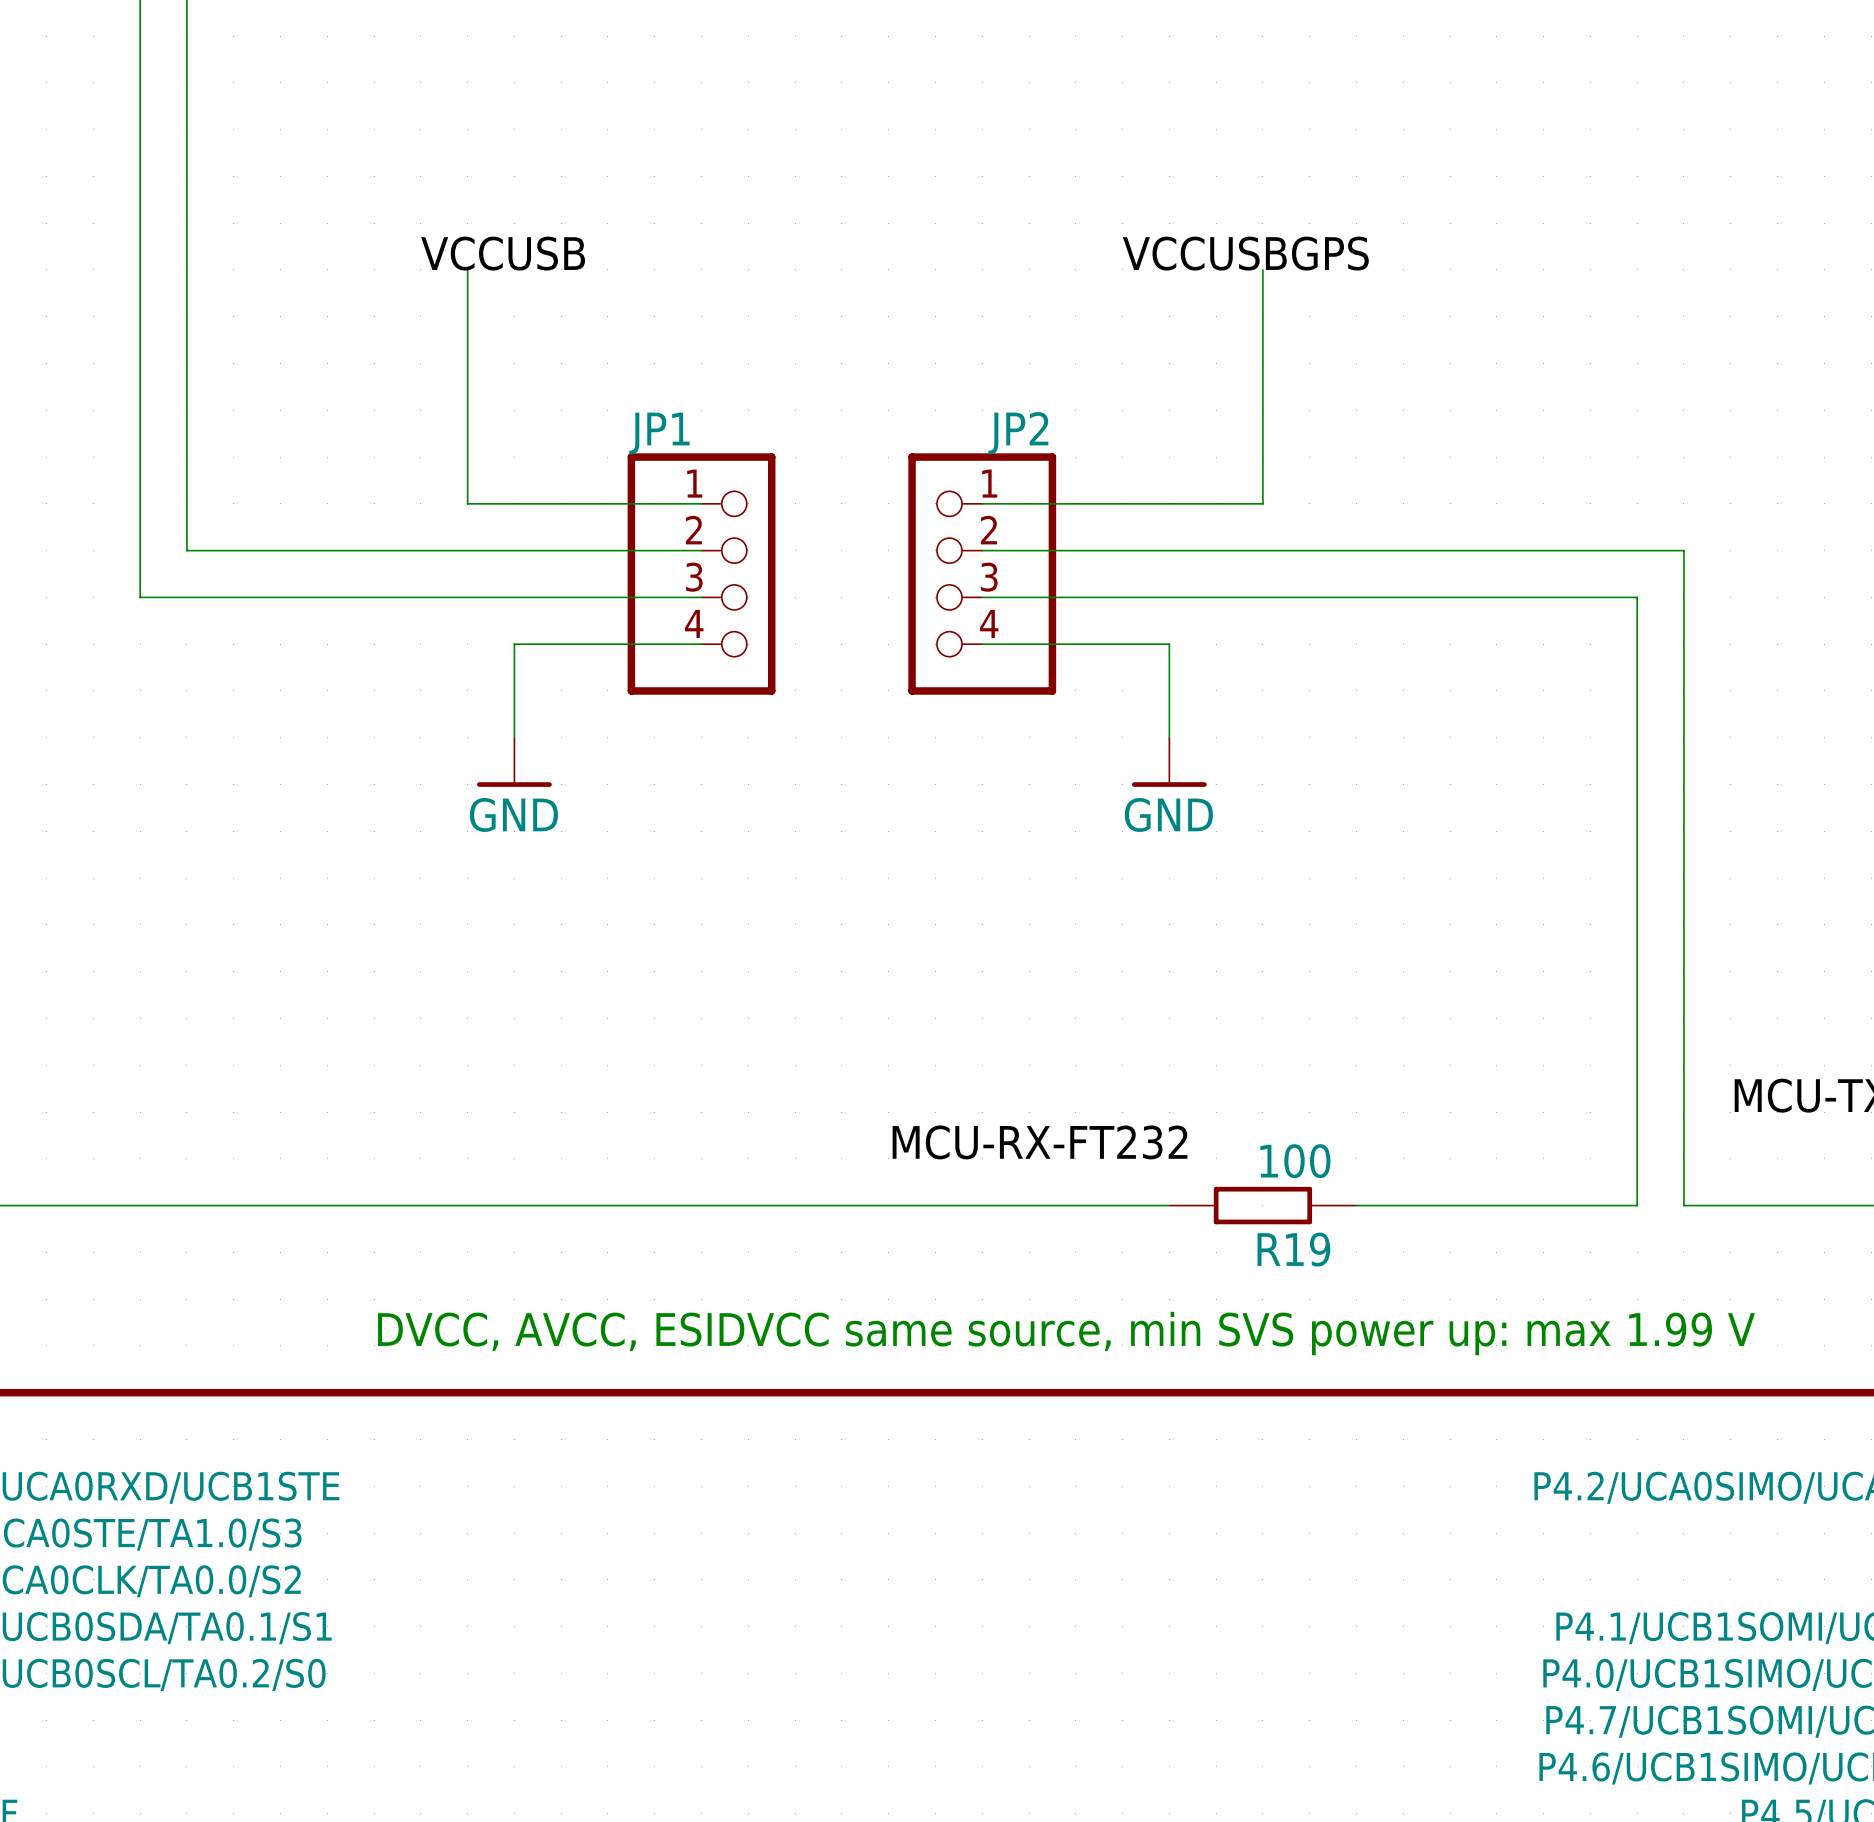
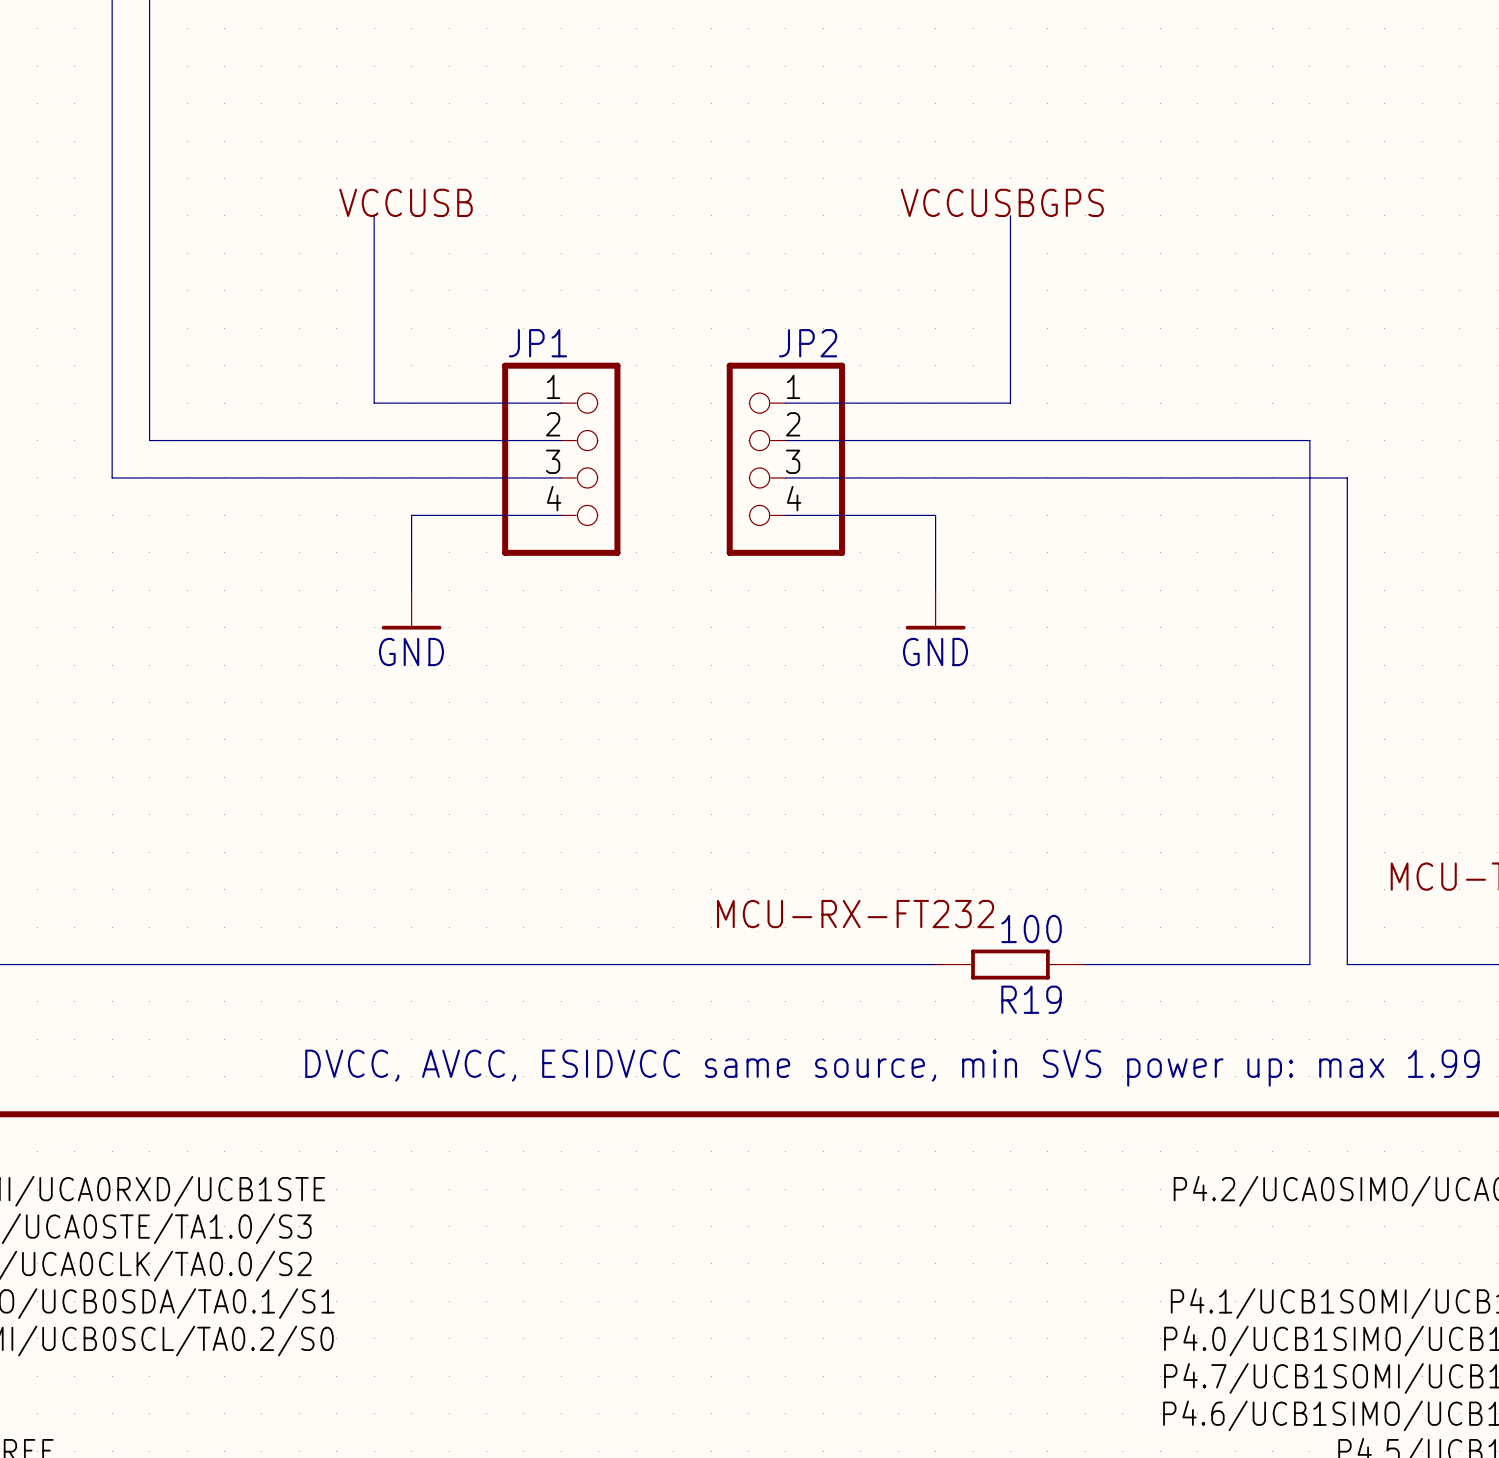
wire: (1637, 550) (1683, 550) (1683, 597) -> (1309, 440) (1309, 477) (1347, 477)

